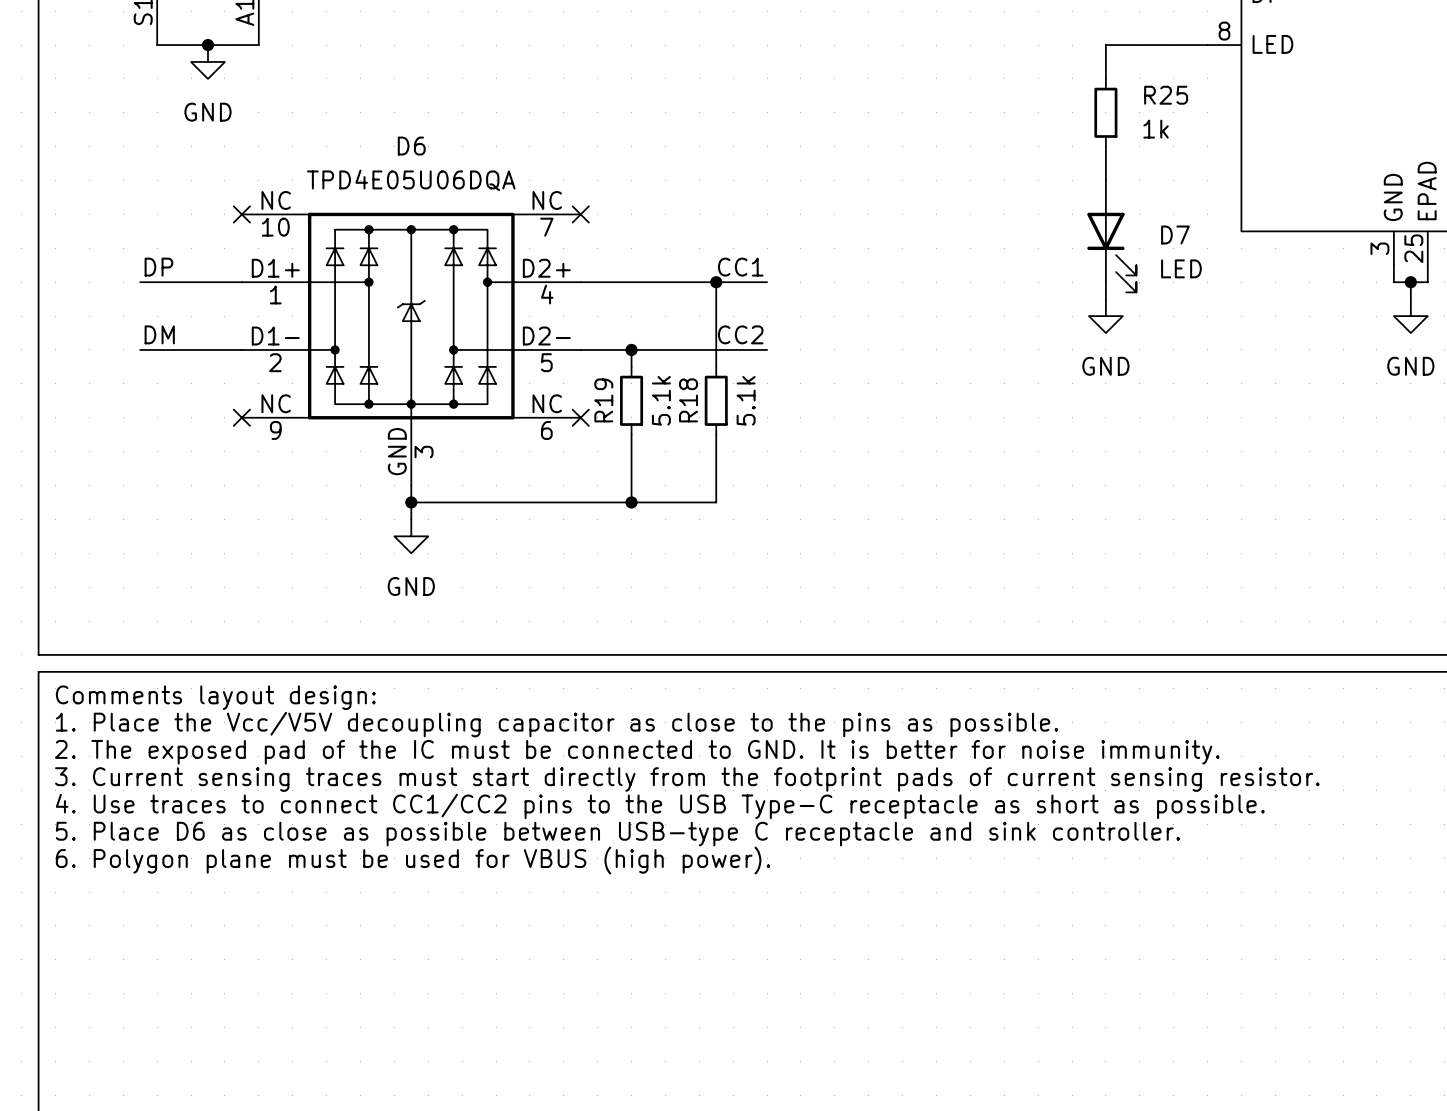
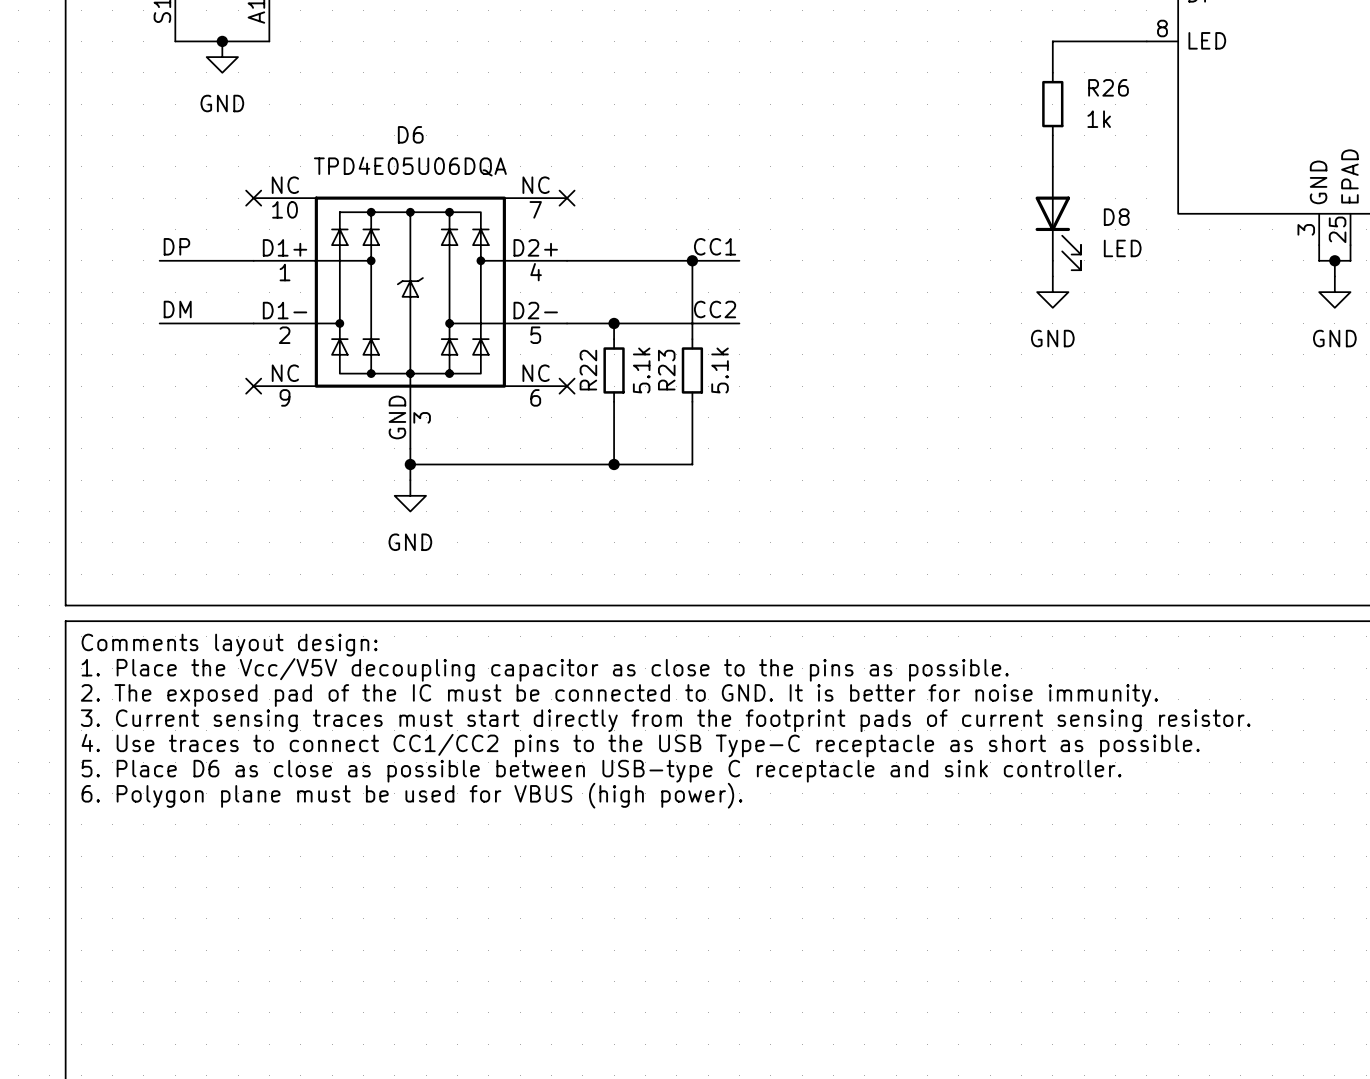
R25 name: R25 (1166, 95) -> R26 (1108, 87)
D7 name: D7 (1175, 234) -> D8 (1116, 217)
R19 name: R19 (603, 400) -> R22 (588, 370)
R18 name: R18 (688, 400) -> R23 (666, 370)

